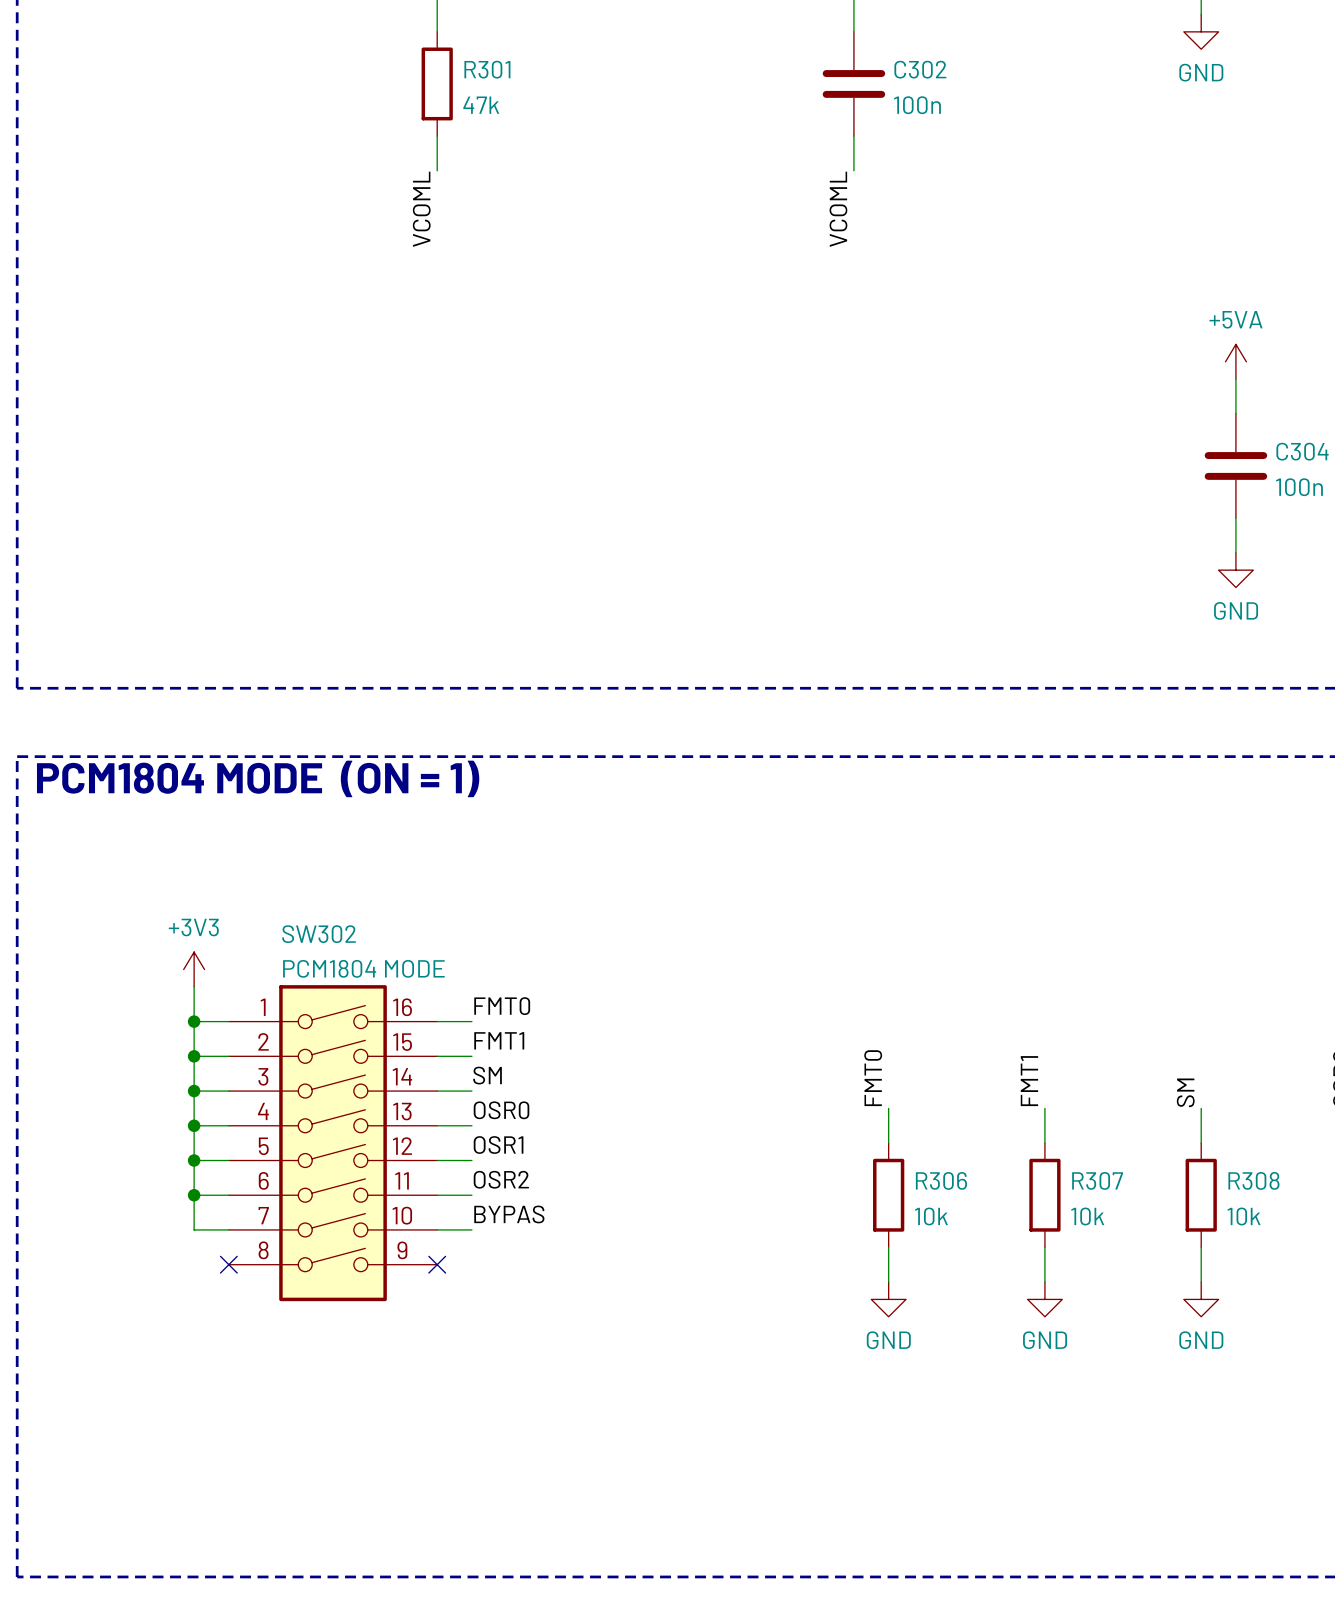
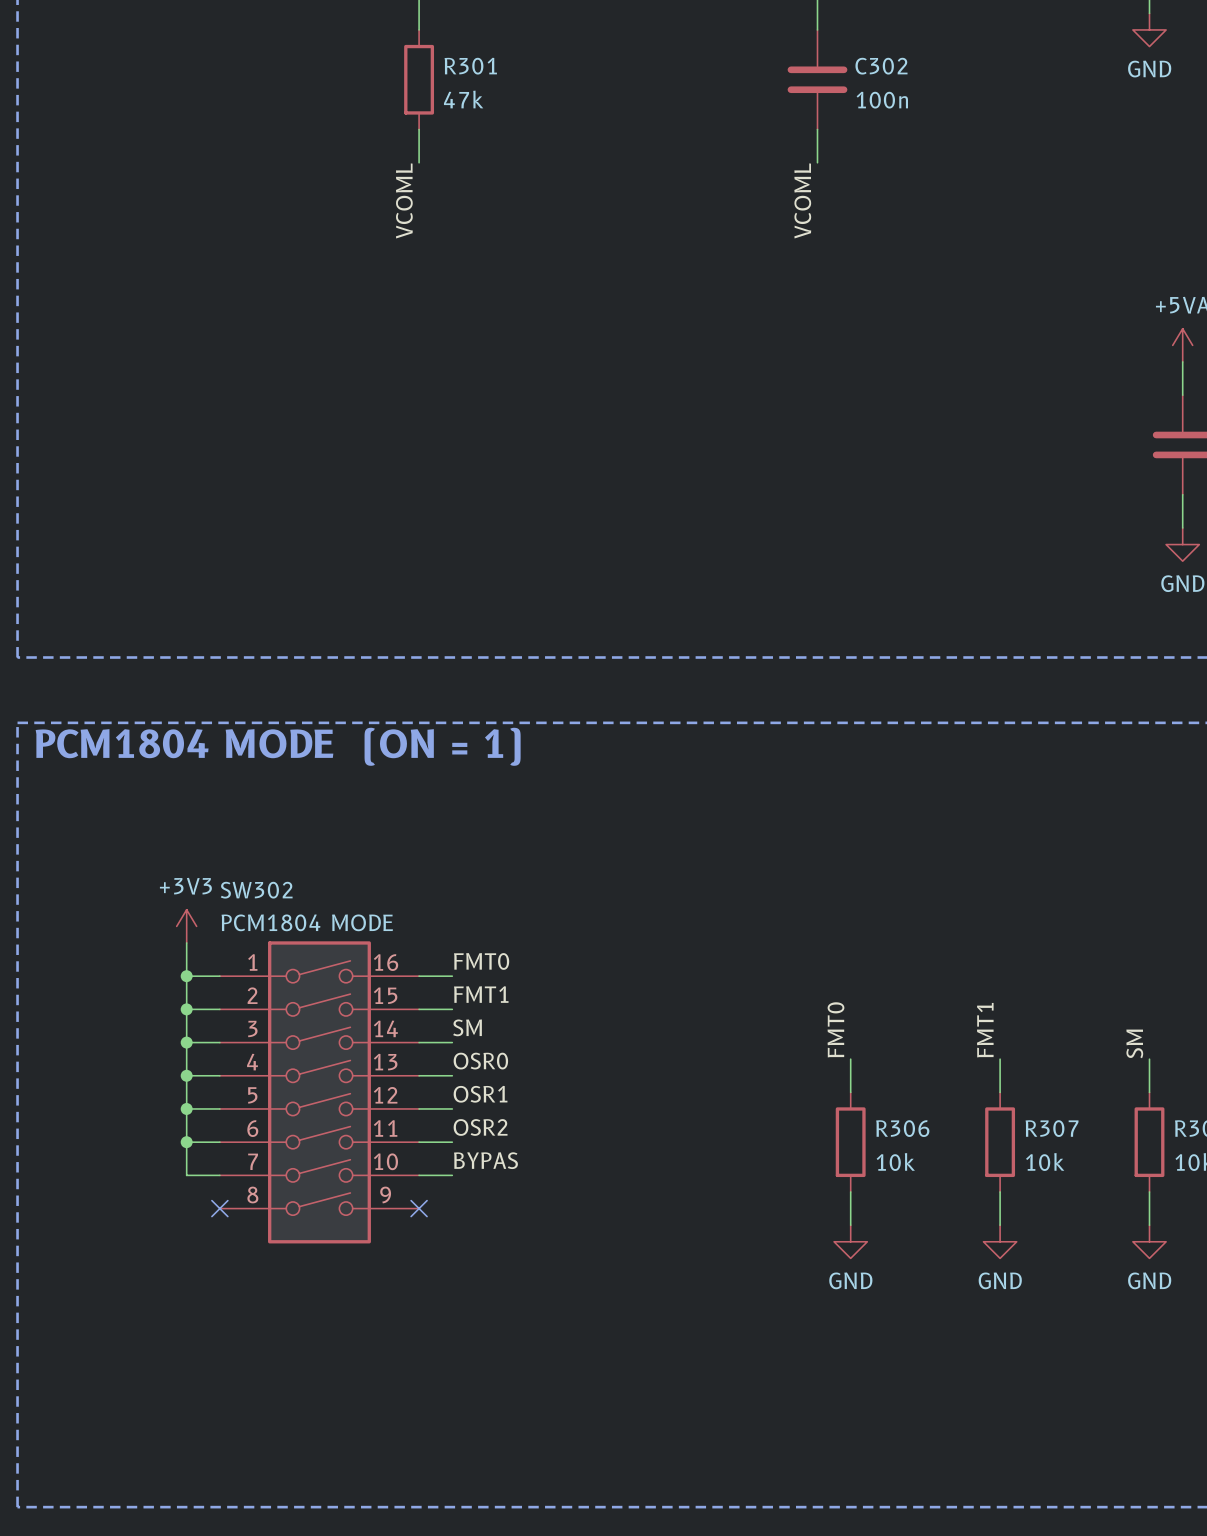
SW302 name position: SW302 (319, 934) -> SW302 (256, 890)
SW302 value position: PCM1804 MODE (363, 968) -> PCM1804 MODE (307, 922)

